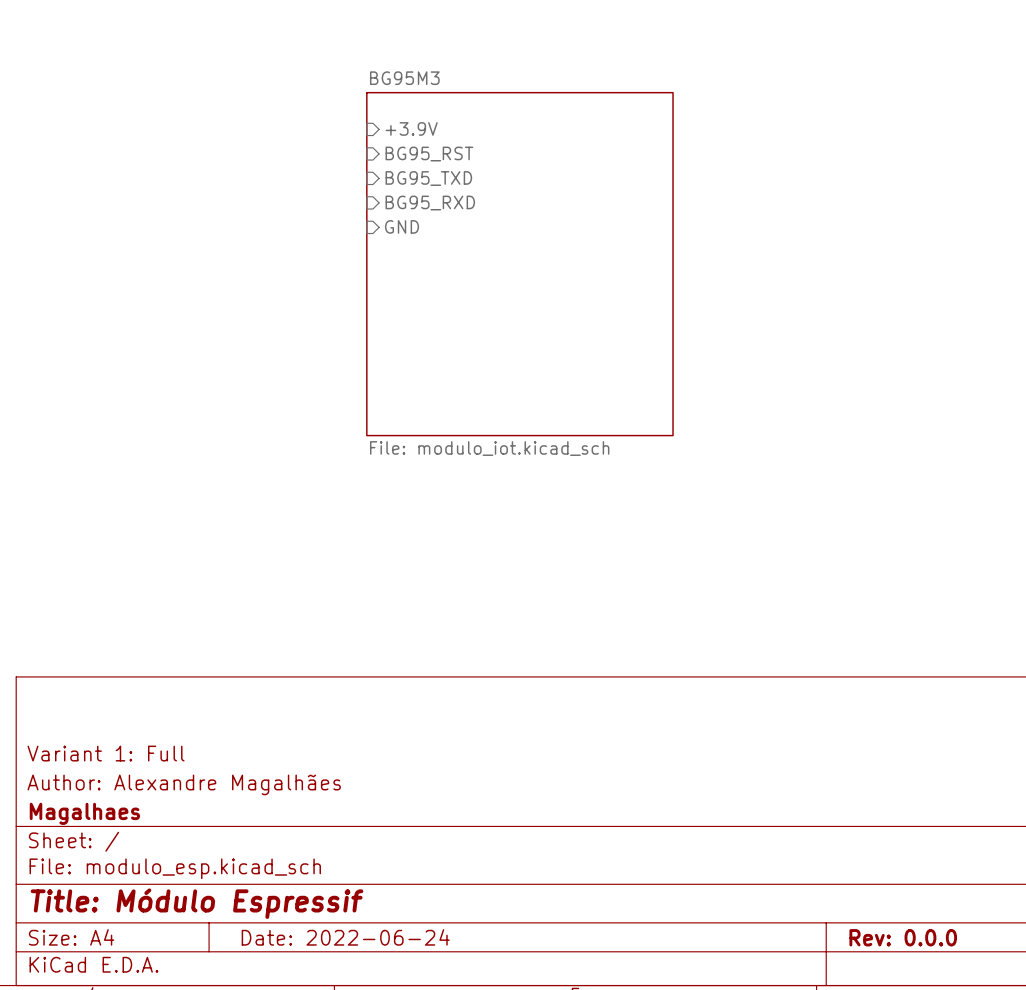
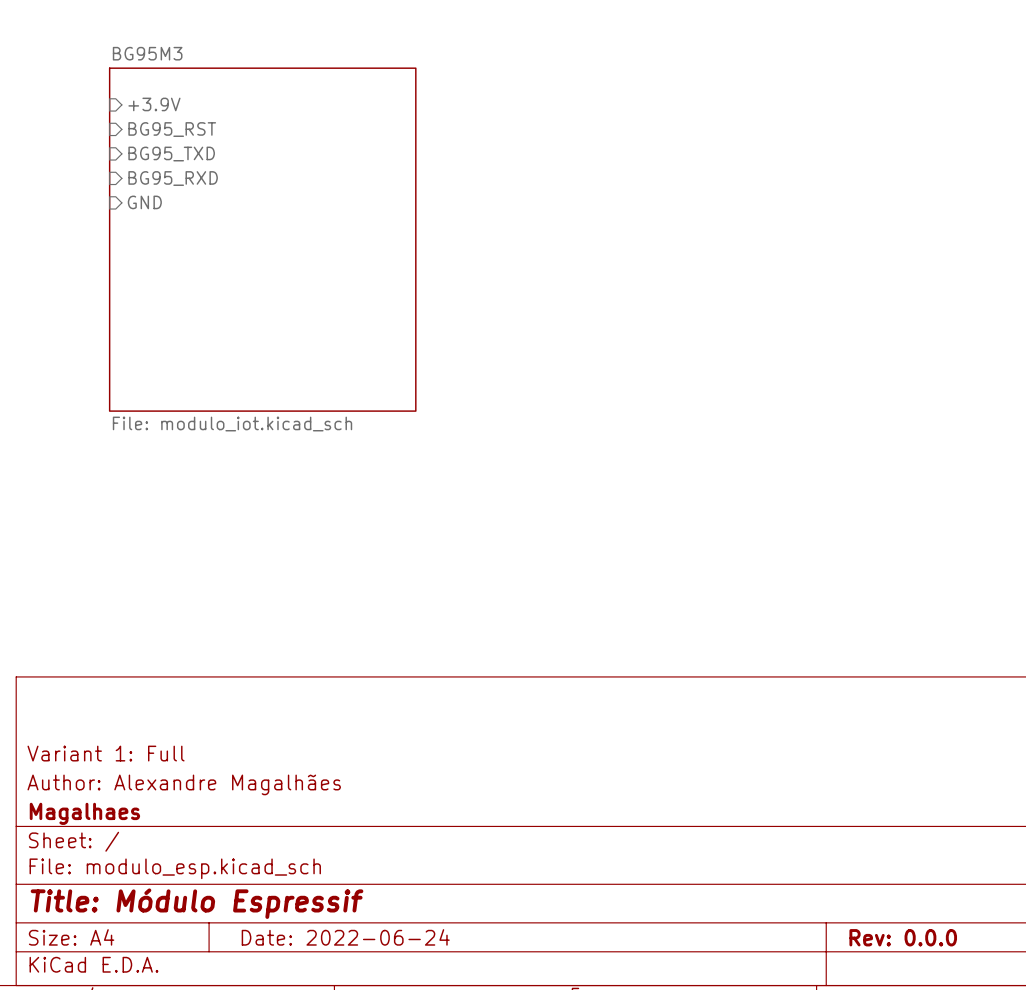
sheet pin: none -> +3.9V (154, 104)
sheet pin: +3.9V (411, 128) -> none
sheet pin: none -> BG95_RST (172, 129)
sheet pin: none -> BG95_TXD (171, 154)
sheet pin: BG95_RST (429, 154) -> none
sheet pin: none -> BG95_RXD (173, 178)
sheet pin: BG95_TXD (428, 178) -> none
sheet pin: none -> GND (144, 202)
sheet pin: BG95_RXD (430, 203) -> none
sheet pin: GND (402, 226) -> none
sheet BG95M3 position: (519, 264) -> (262, 239)

